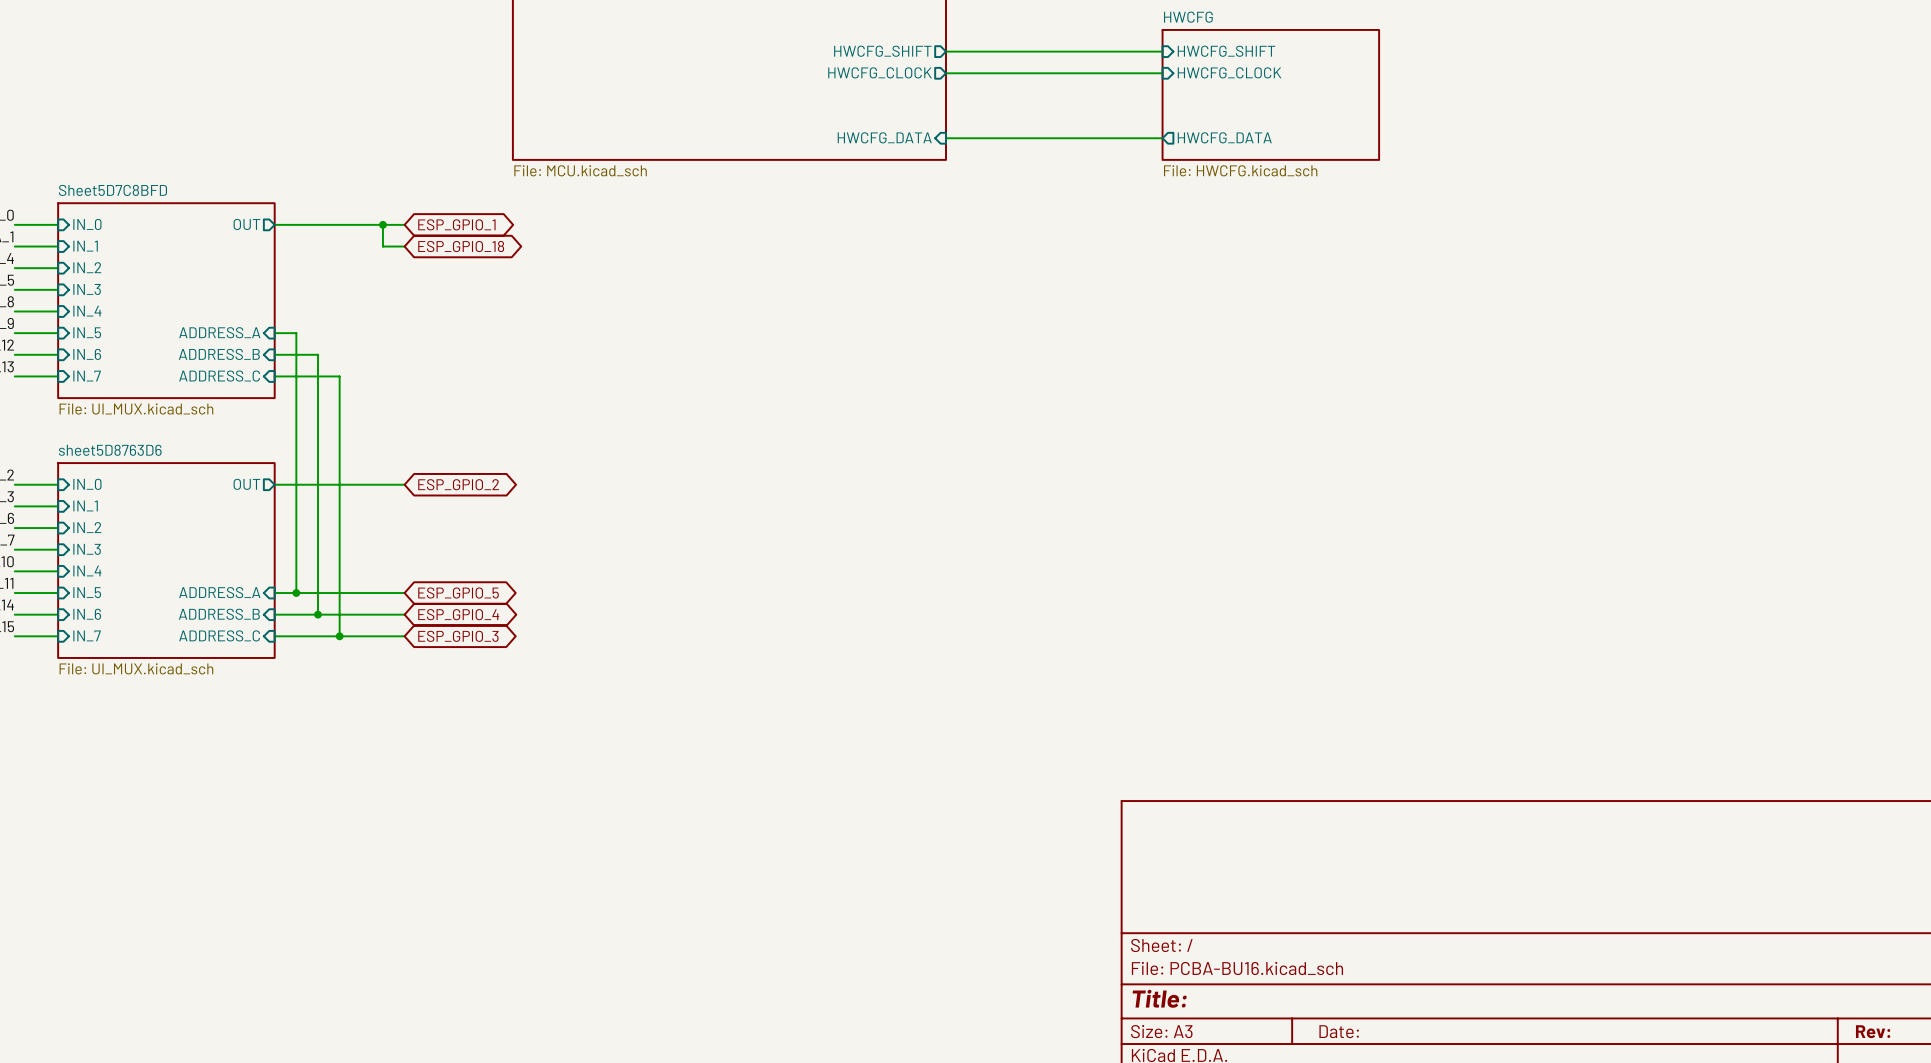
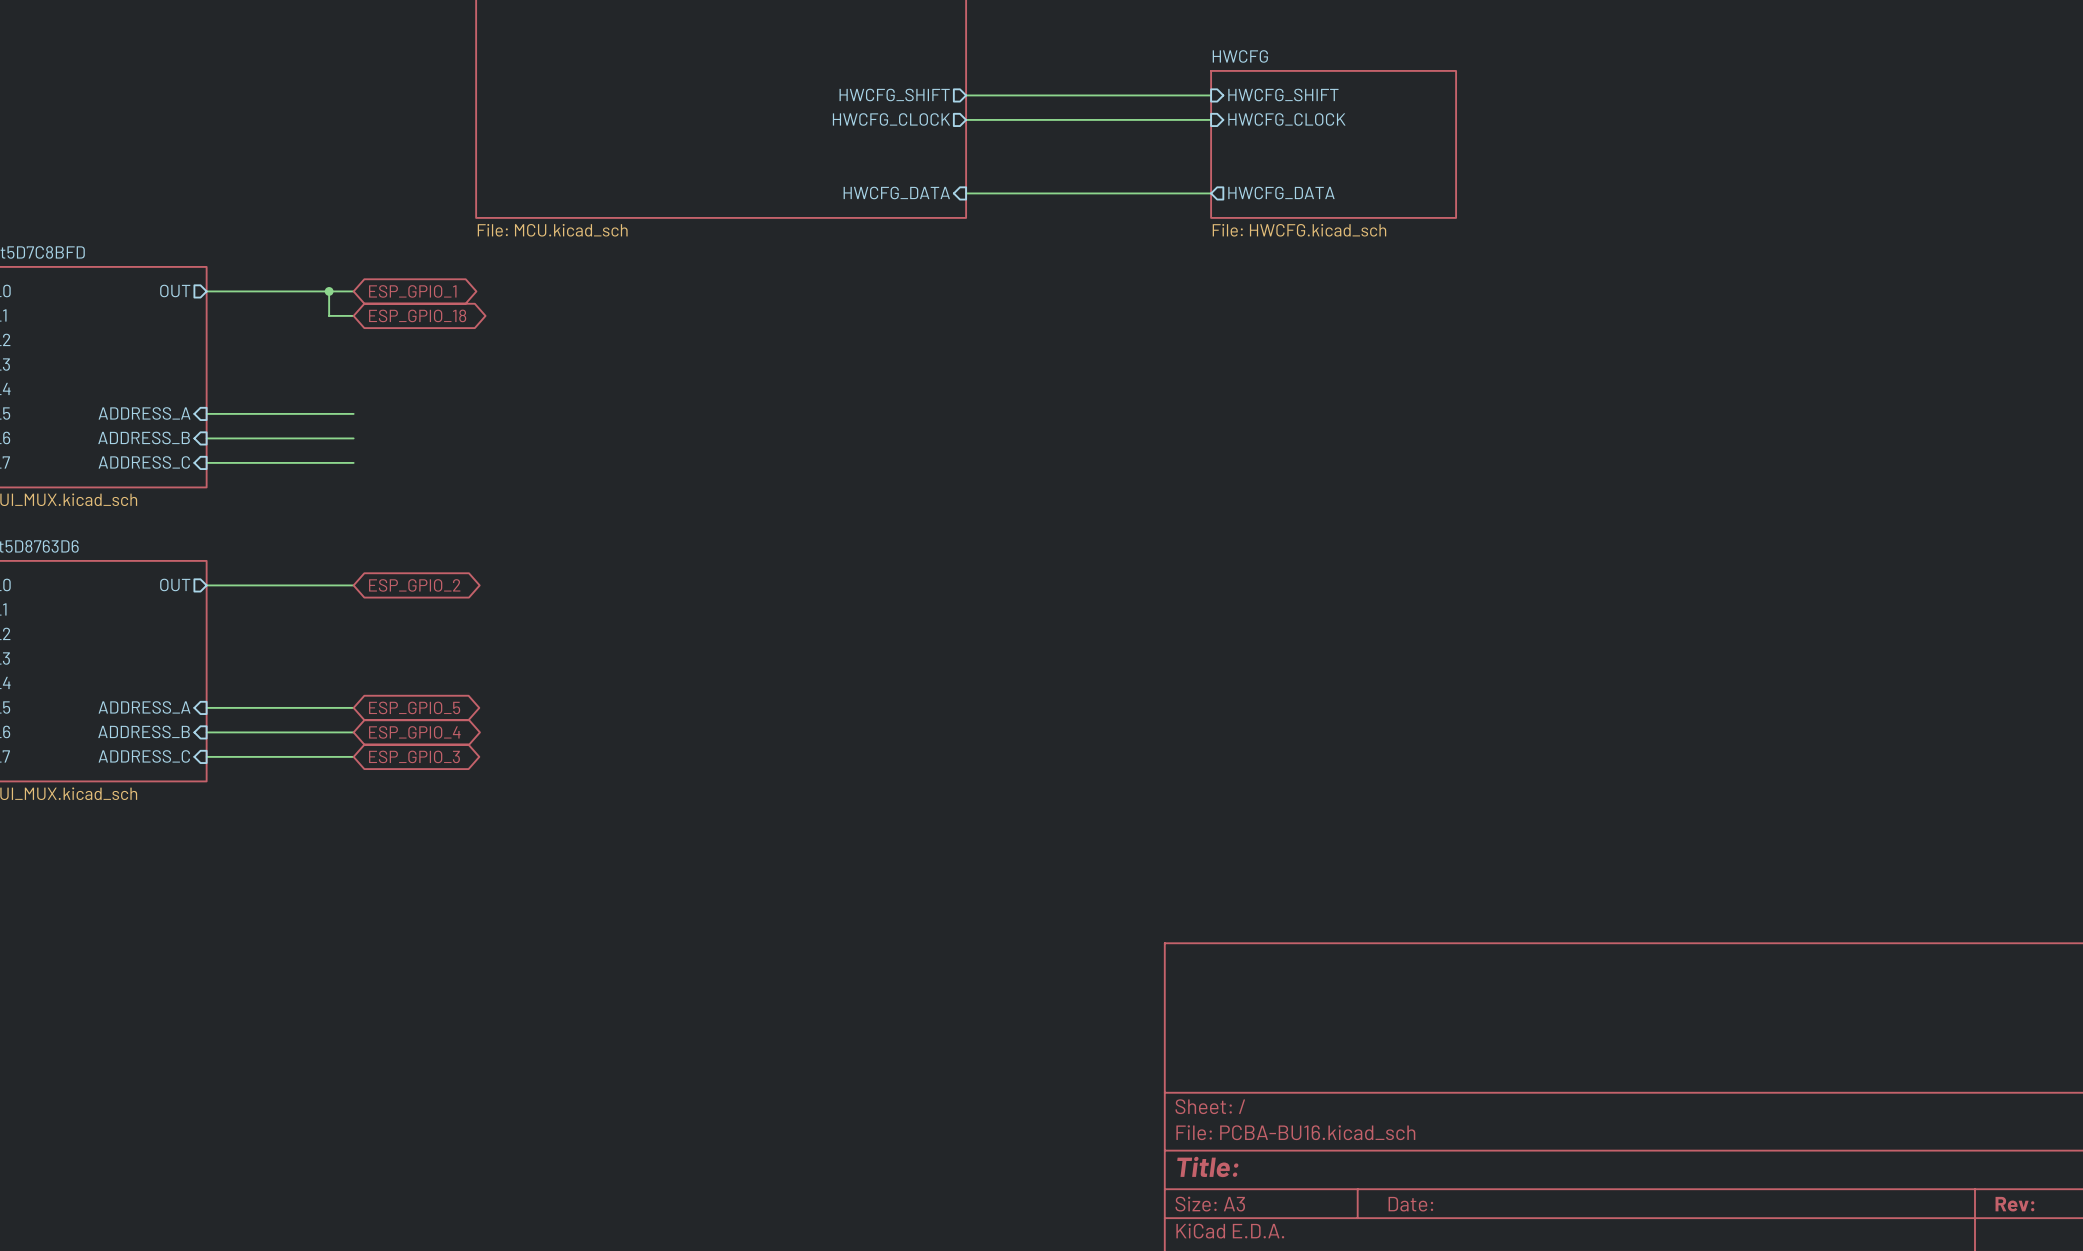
wire: (296, 333) (296, 593) -> (231, 413) (353, 413)
wire: (318, 354) (318, 614) -> (255, 438) (353, 438)
wire: (339, 376) (339, 636) -> (280, 462) (353, 462)
junction: (296, 593) -> none
junction: (318, 614) -> none
junction: (339, 636) -> none

